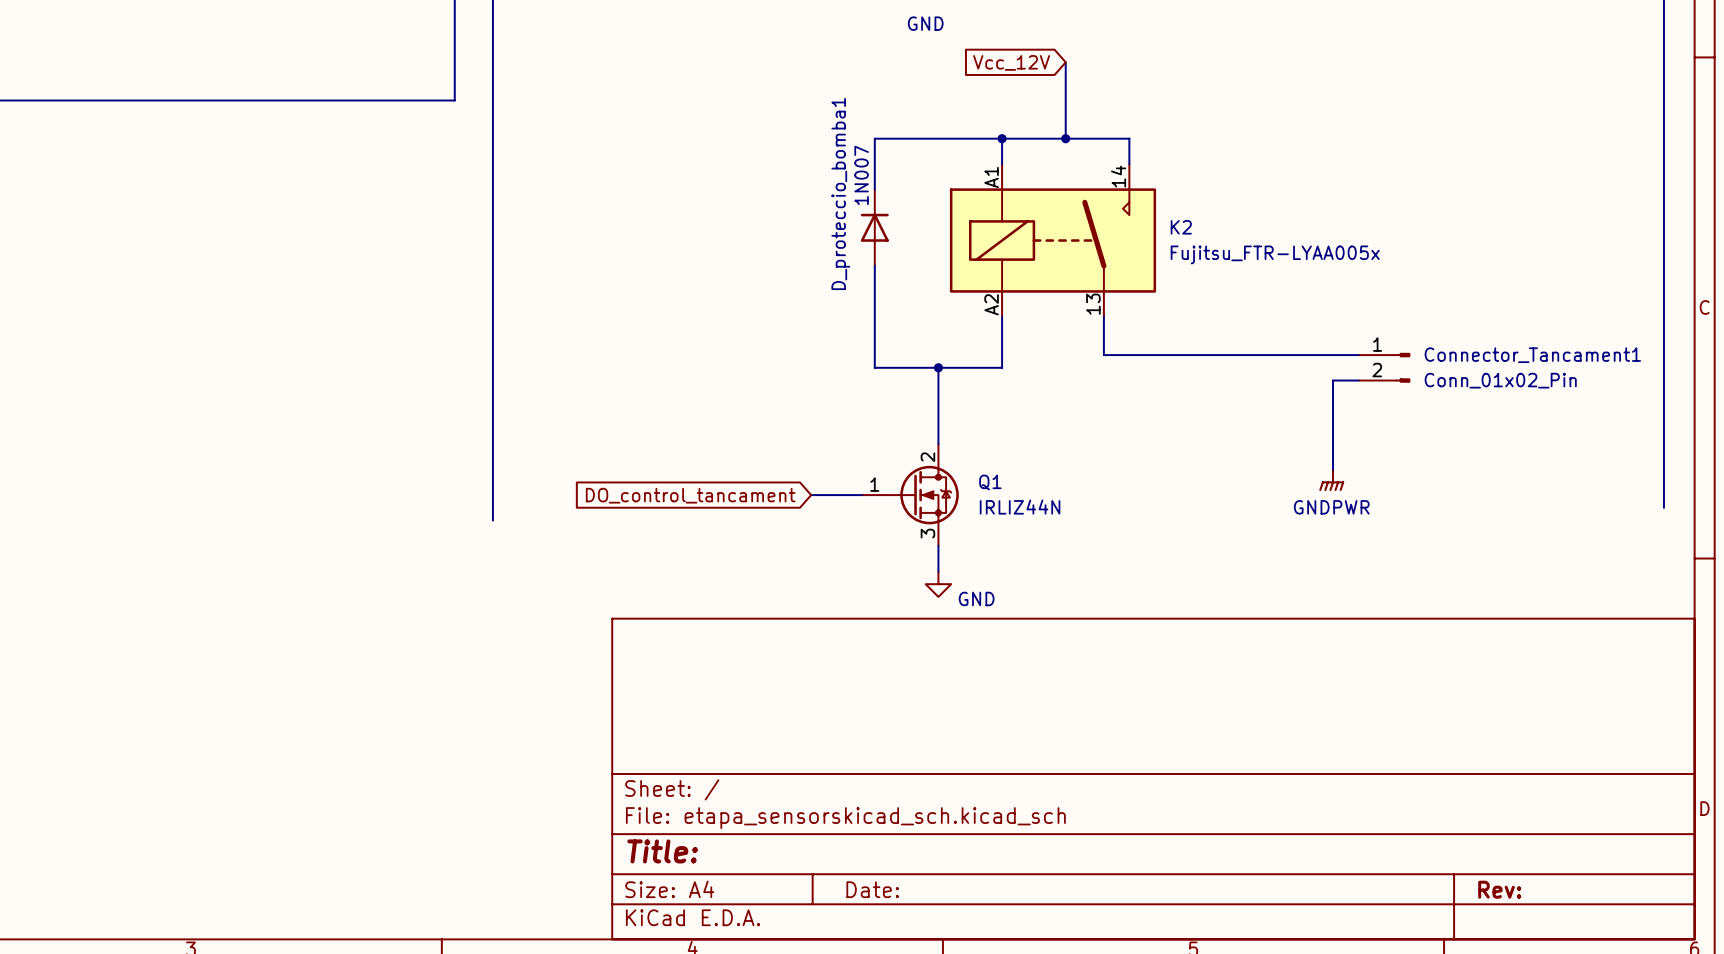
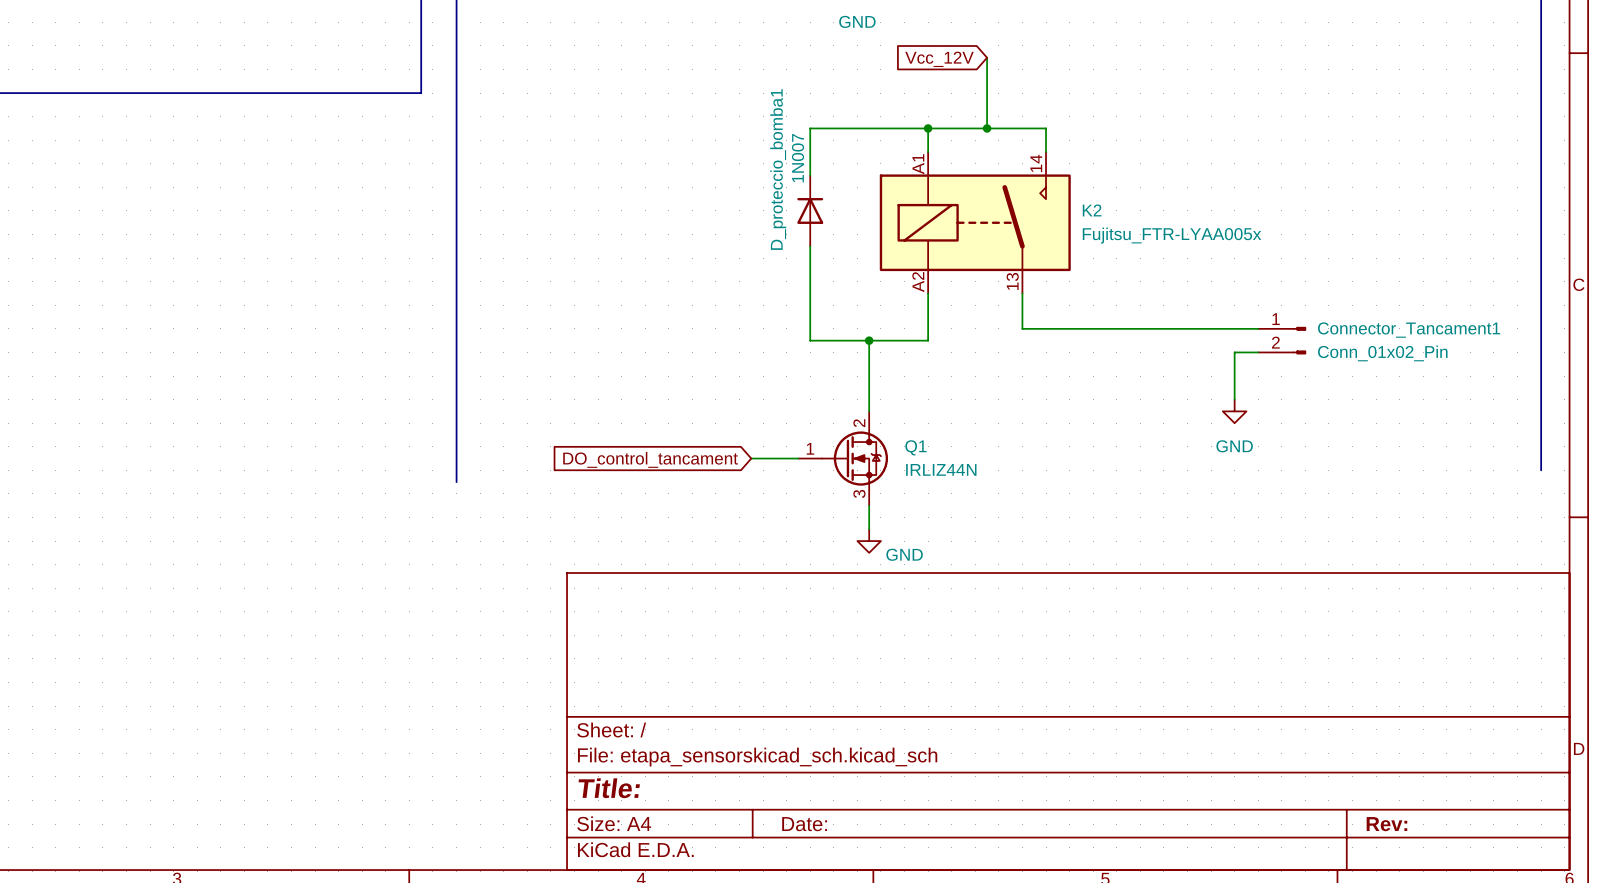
wire: (1333, 431) (1333, 469) -> none
power symbol: none -> GND (1234, 411)
power symbol: GNDPWR (1331, 480) -> none

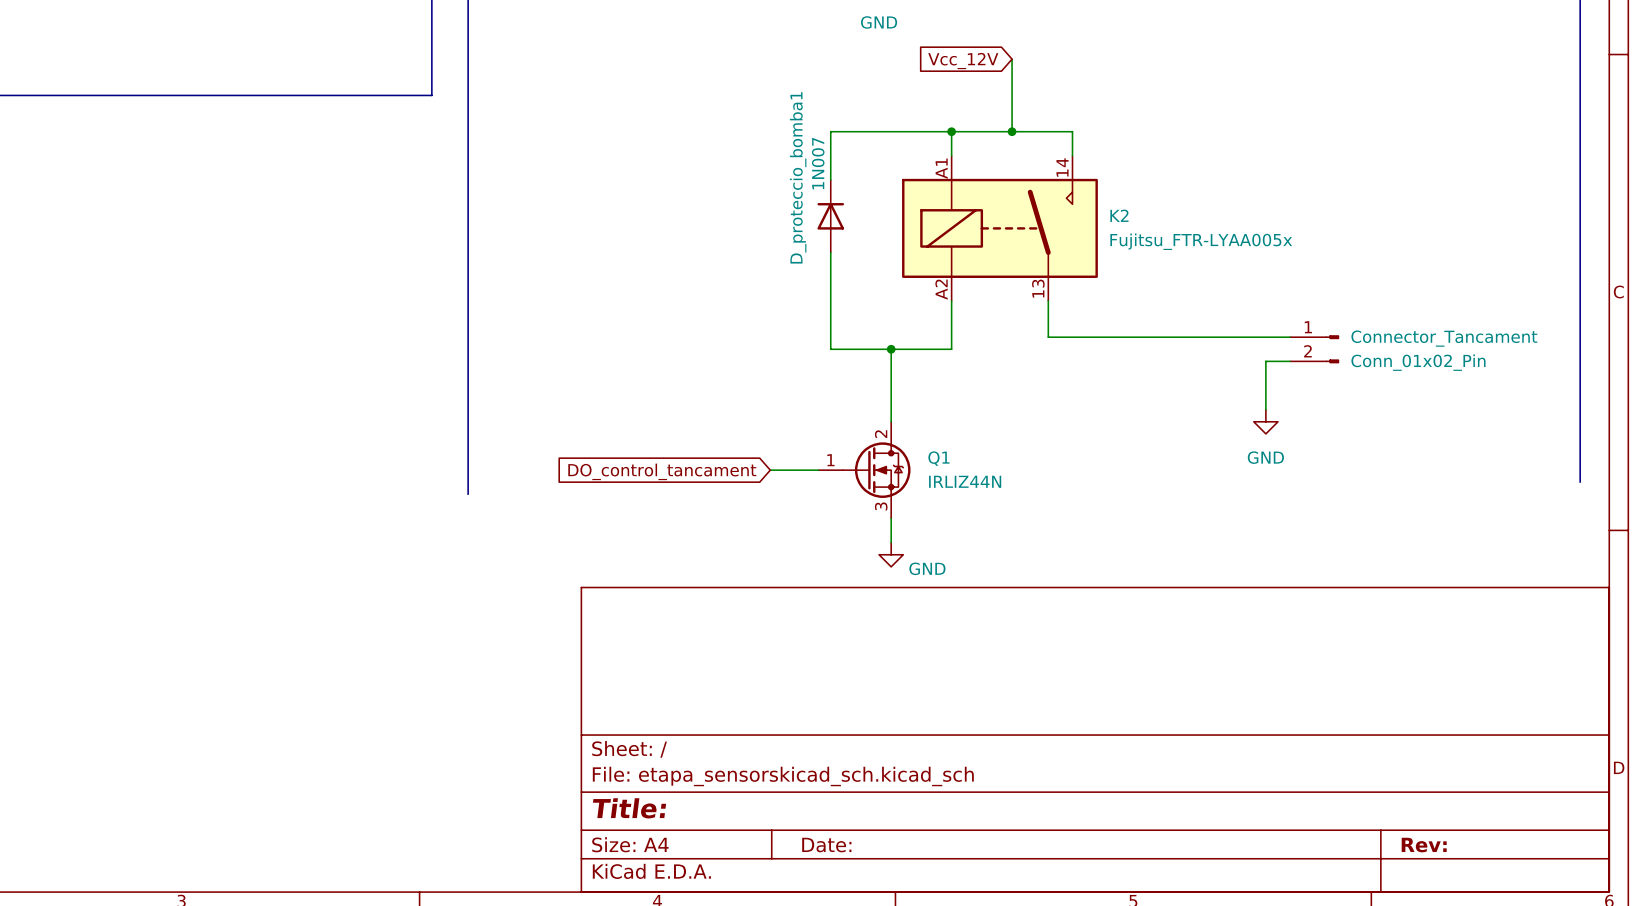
Connector_Tancament1 name: Connector_Tancament1 (1409, 330) -> Connector_Tancament (1444, 338)

